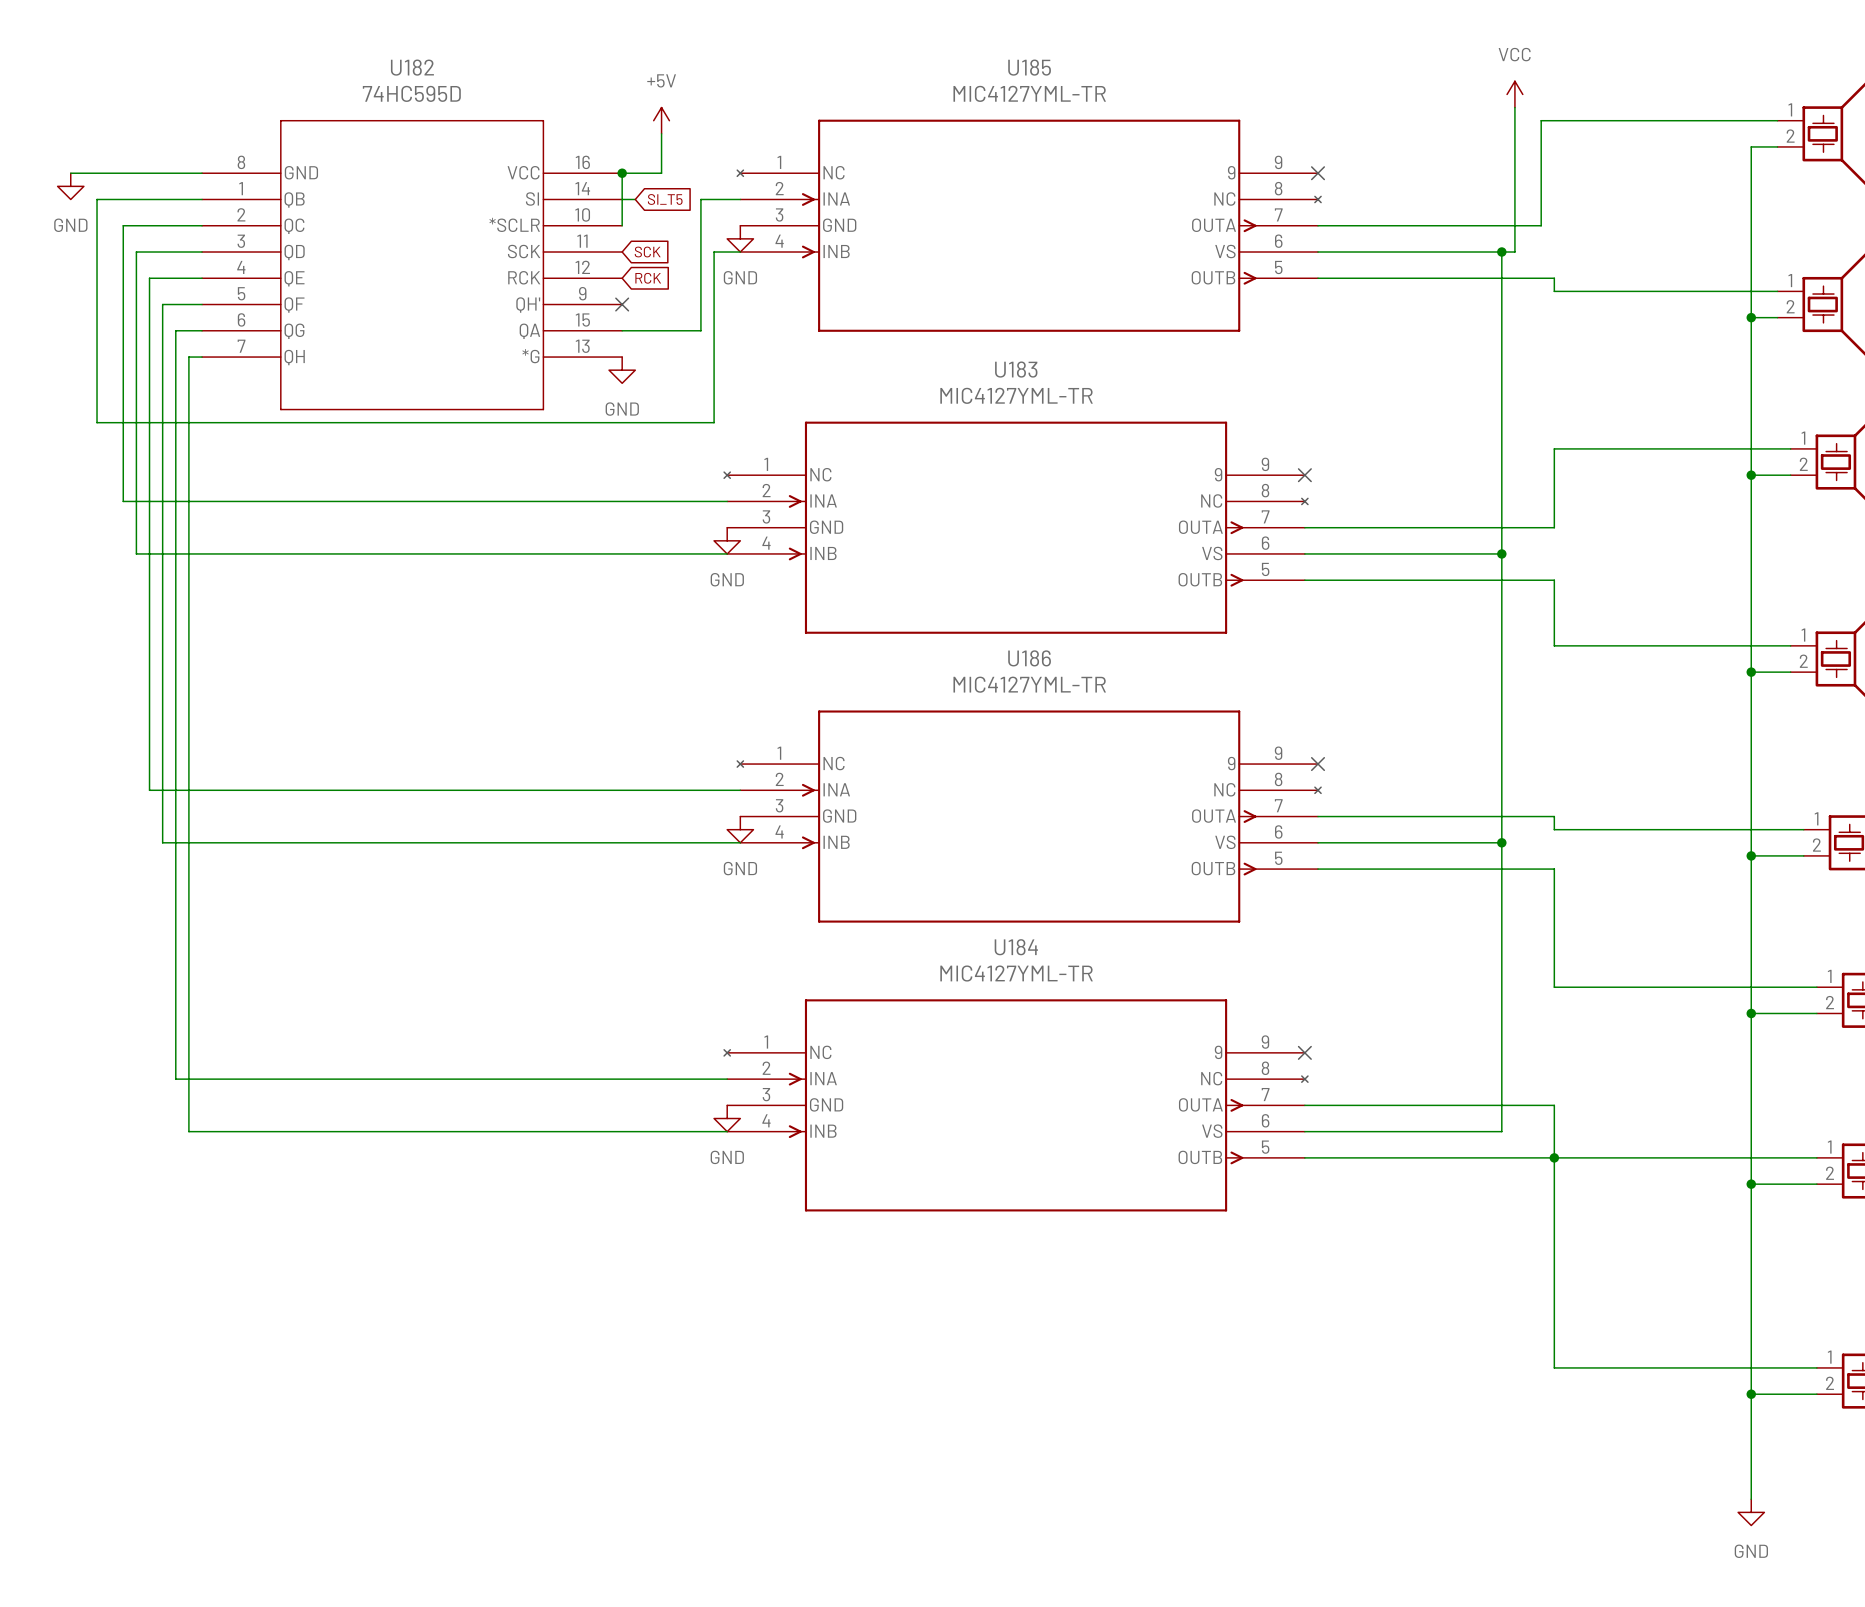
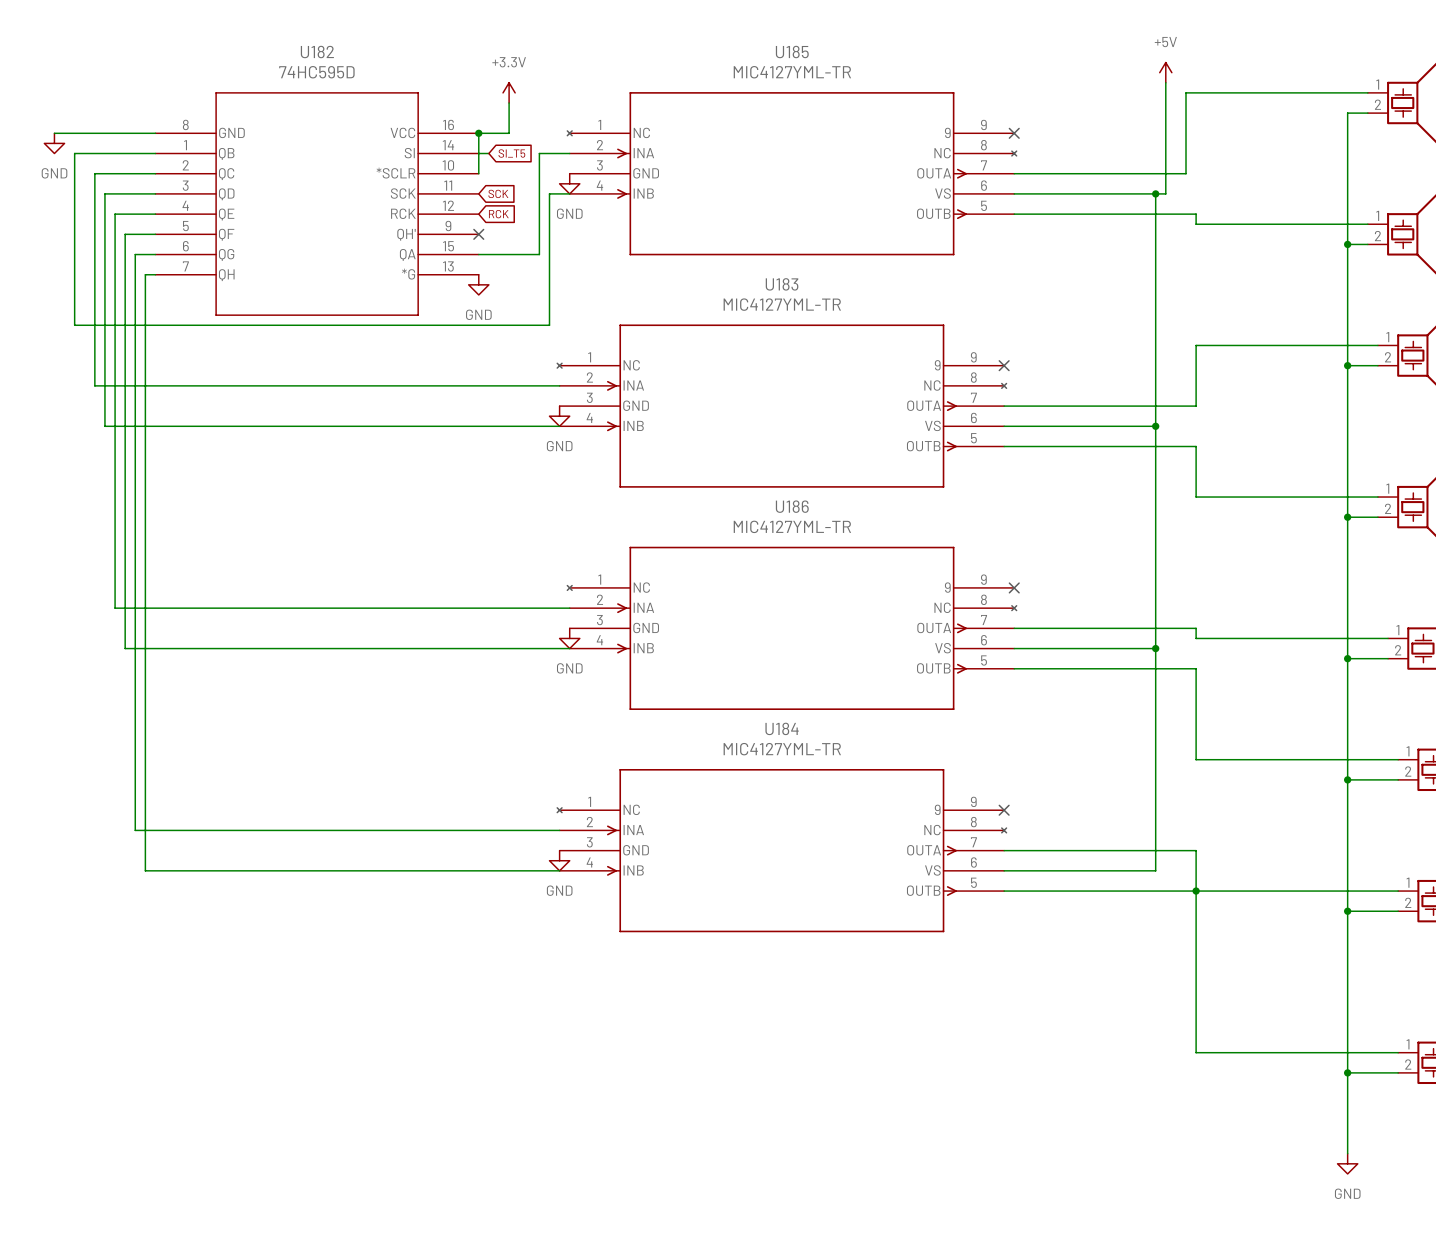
power symbol: VCC (1514, 94) -> +5V (1165, 72)
power symbol: +5V (661, 120) -> +3.3V (509, 92)

